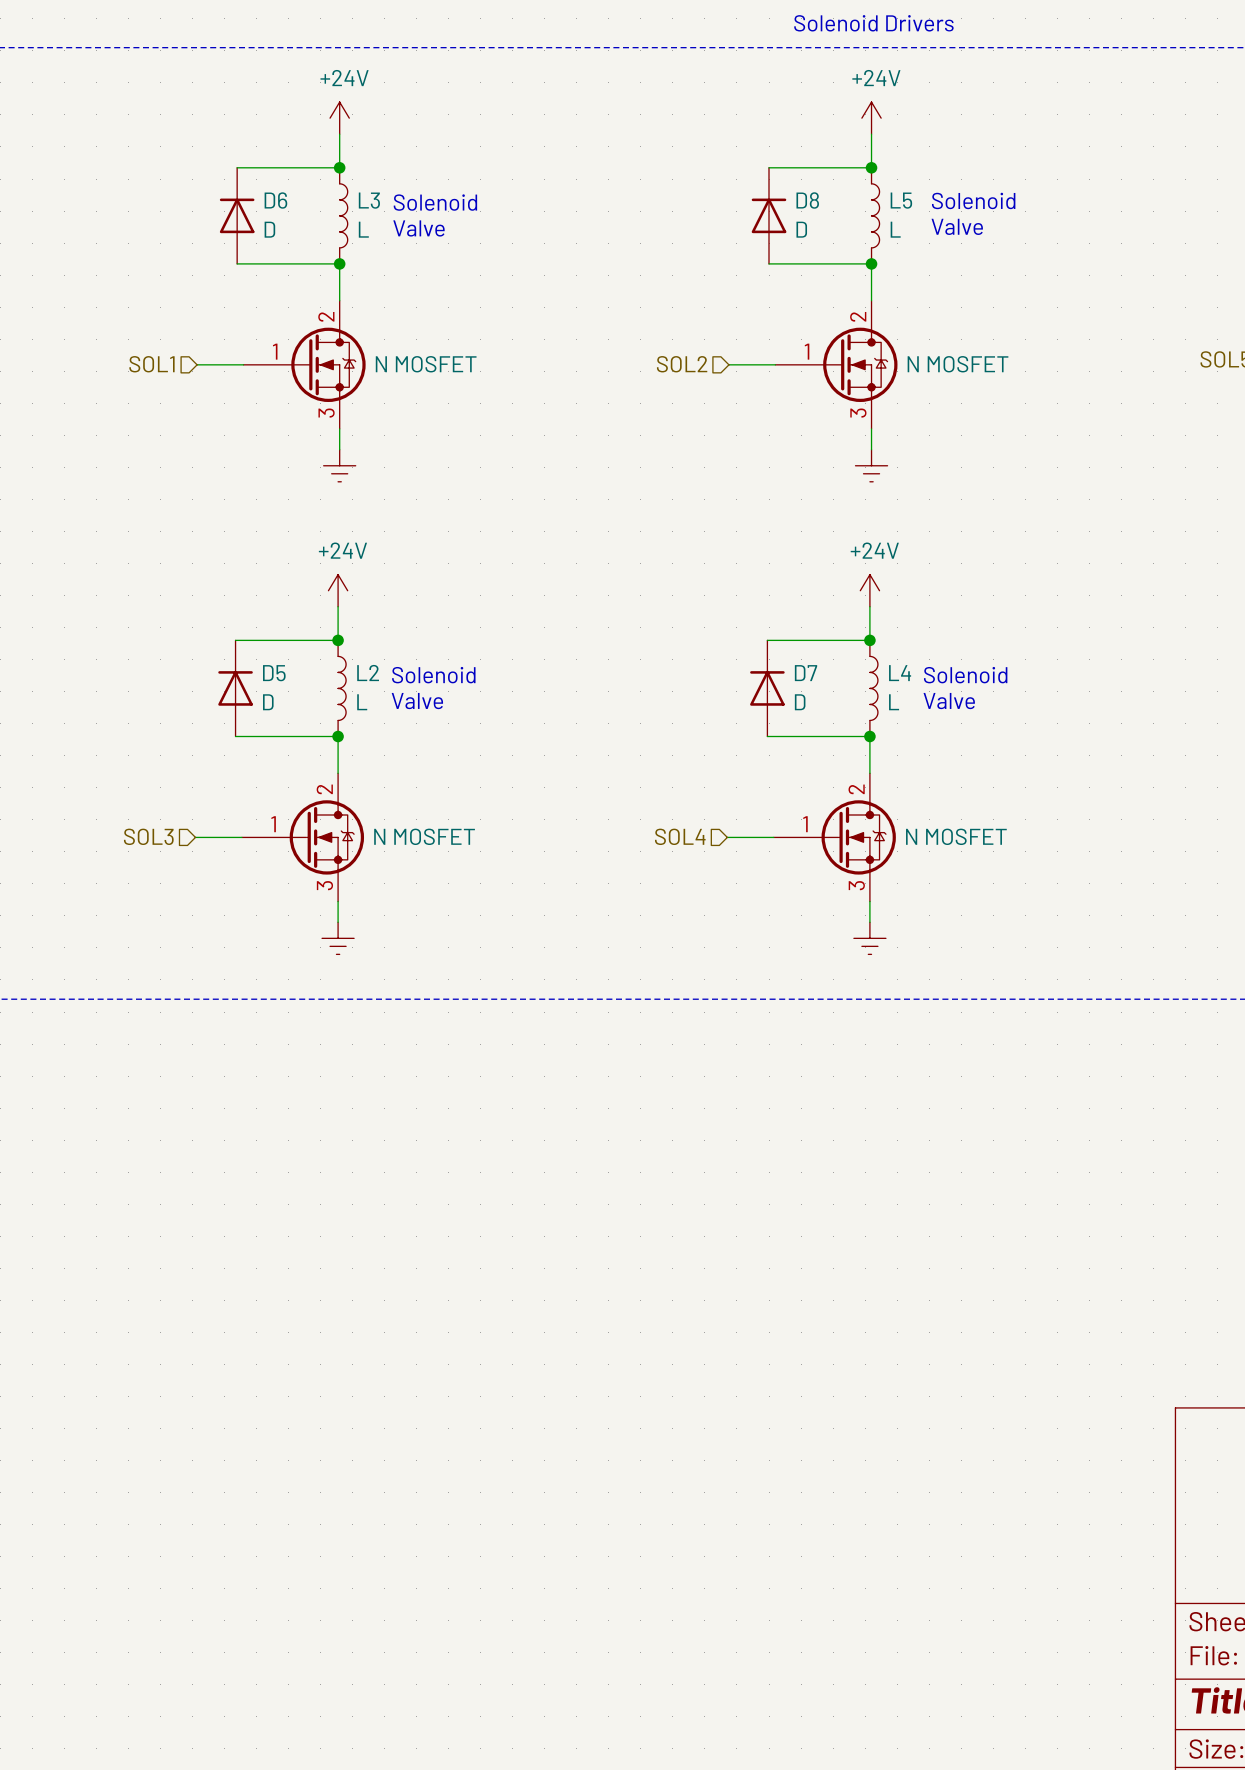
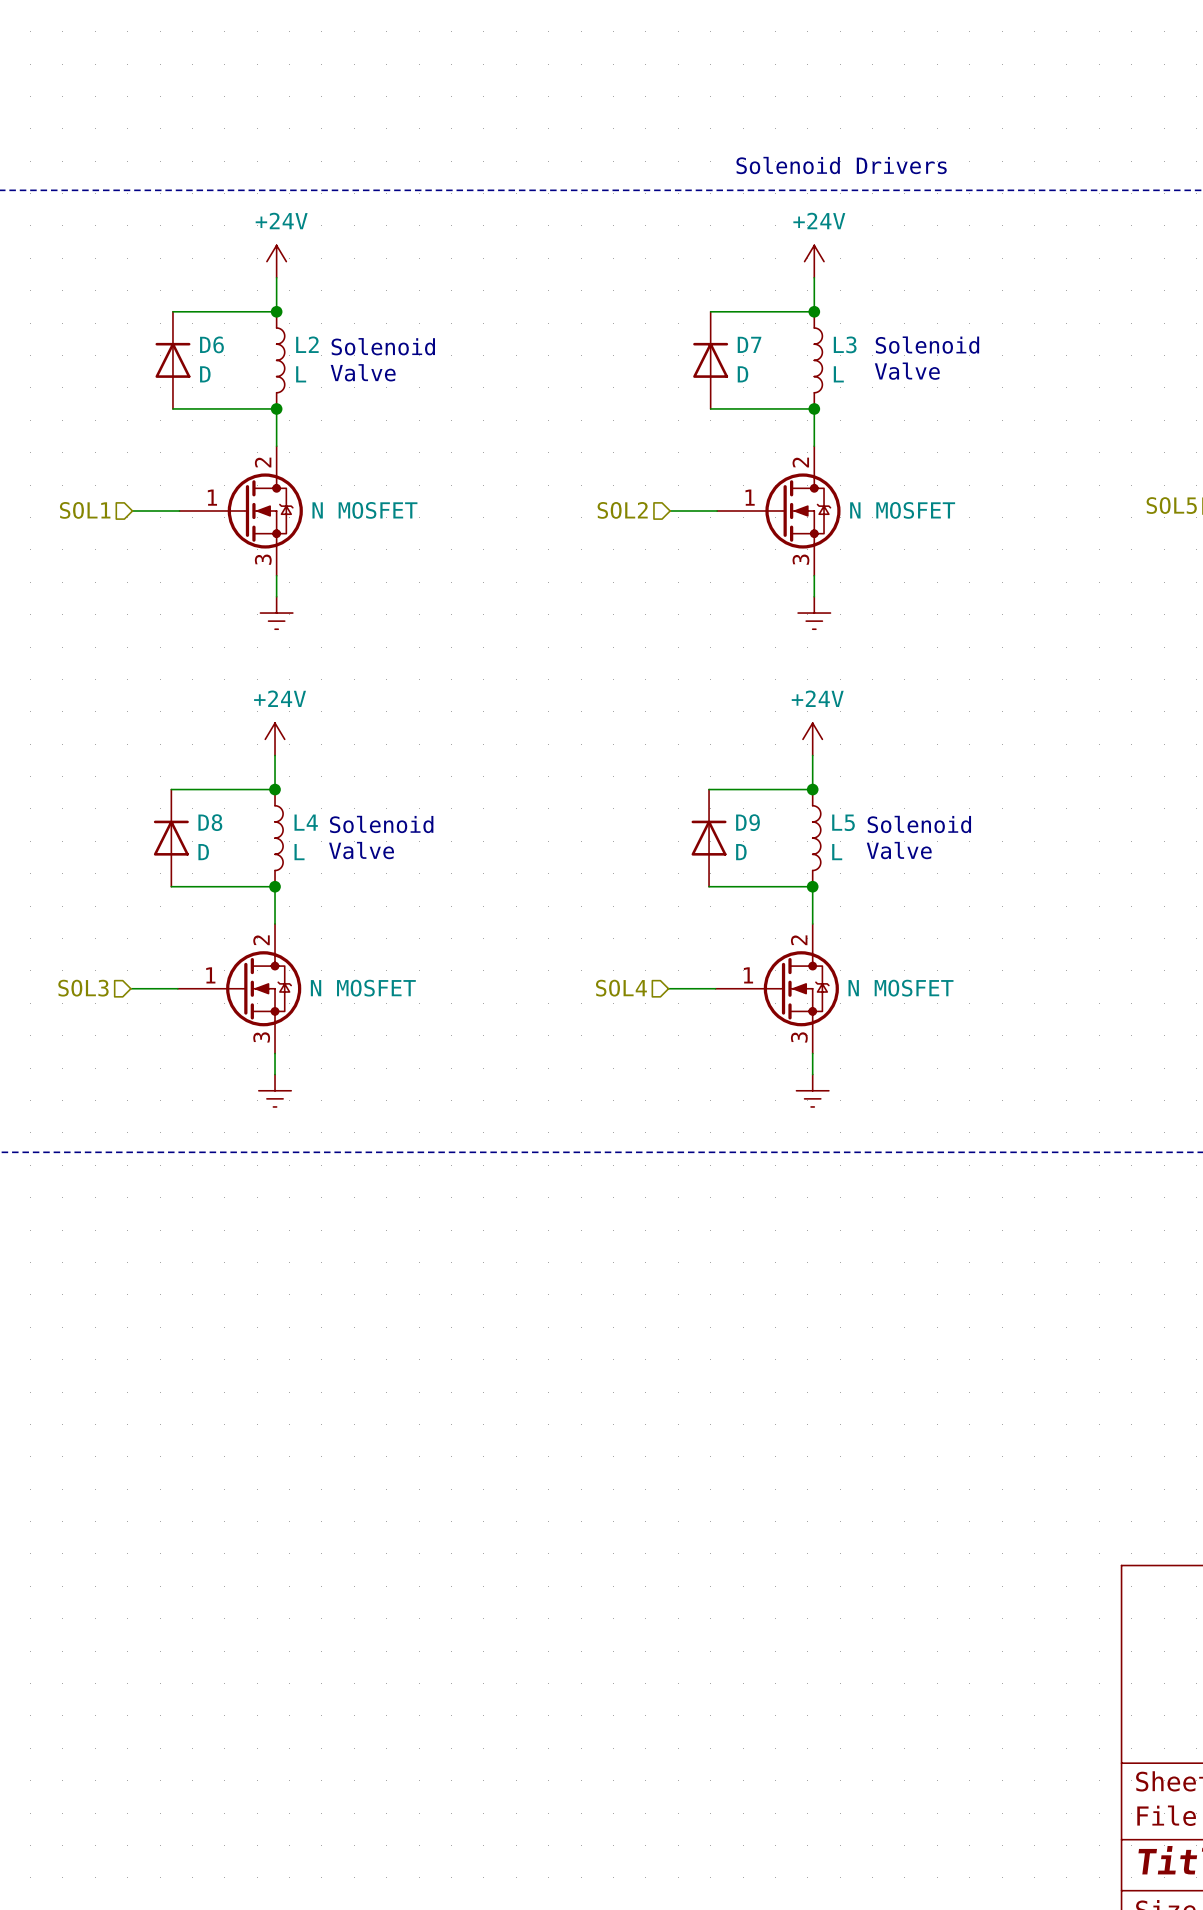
L3 name: L3 (369, 200) -> L2 (307, 344)
D8 name: D8 (807, 200) -> D7 (749, 344)
L5 name: L5 (901, 200) -> L3 (845, 344)
D5 name: D5 (274, 673) -> D8 (210, 822)
L2 name: L2 (368, 673) -> L4 (306, 822)
D7 name: D7 (806, 673) -> D9 (747, 822)
L4 name: L4 (900, 673) -> L5 (843, 822)

